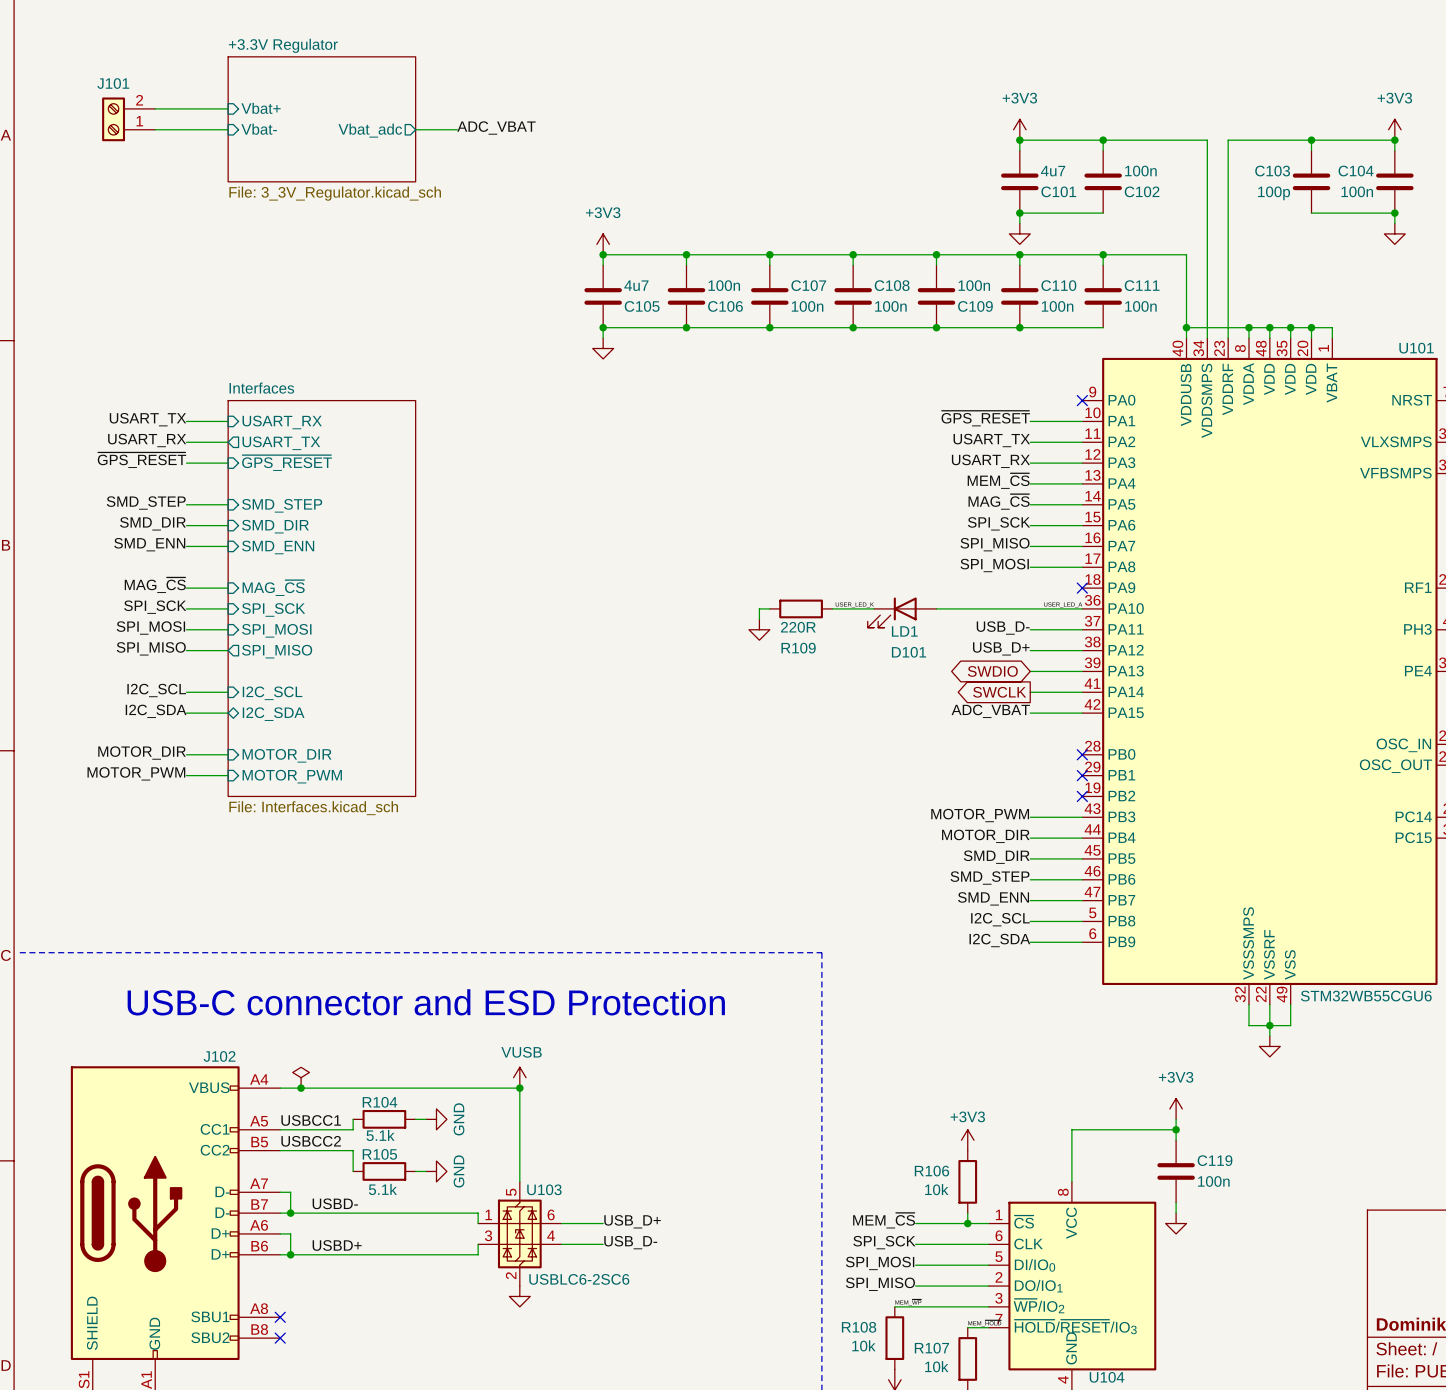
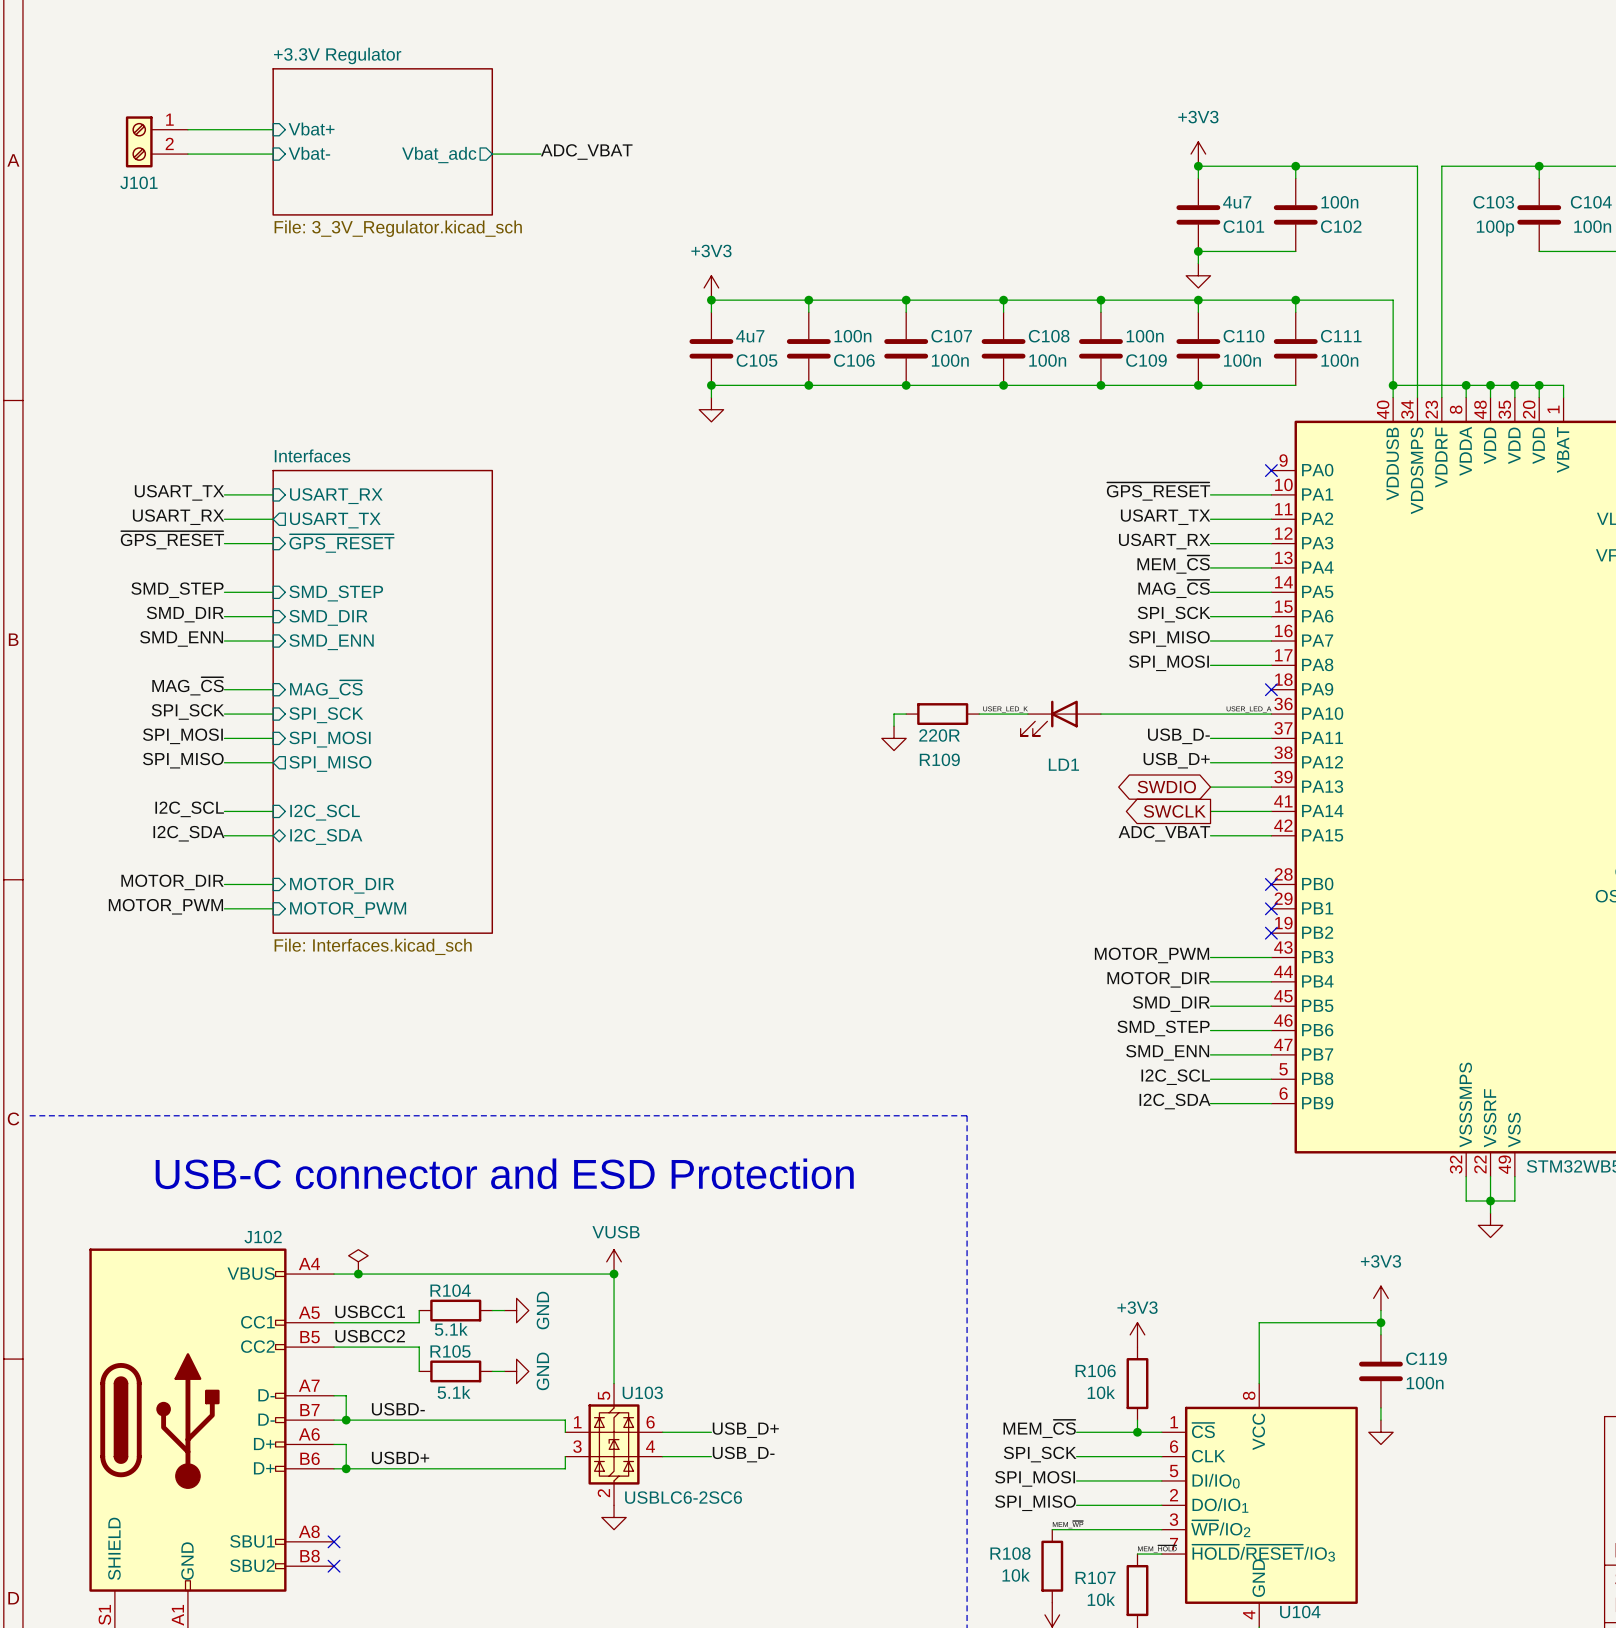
J101 flip: as is (113, 119) -> up-down (139, 141)
D101 value: LD1 (904, 631) -> none
D101 name: D101 (909, 652) -> LD1 (1063, 764)

